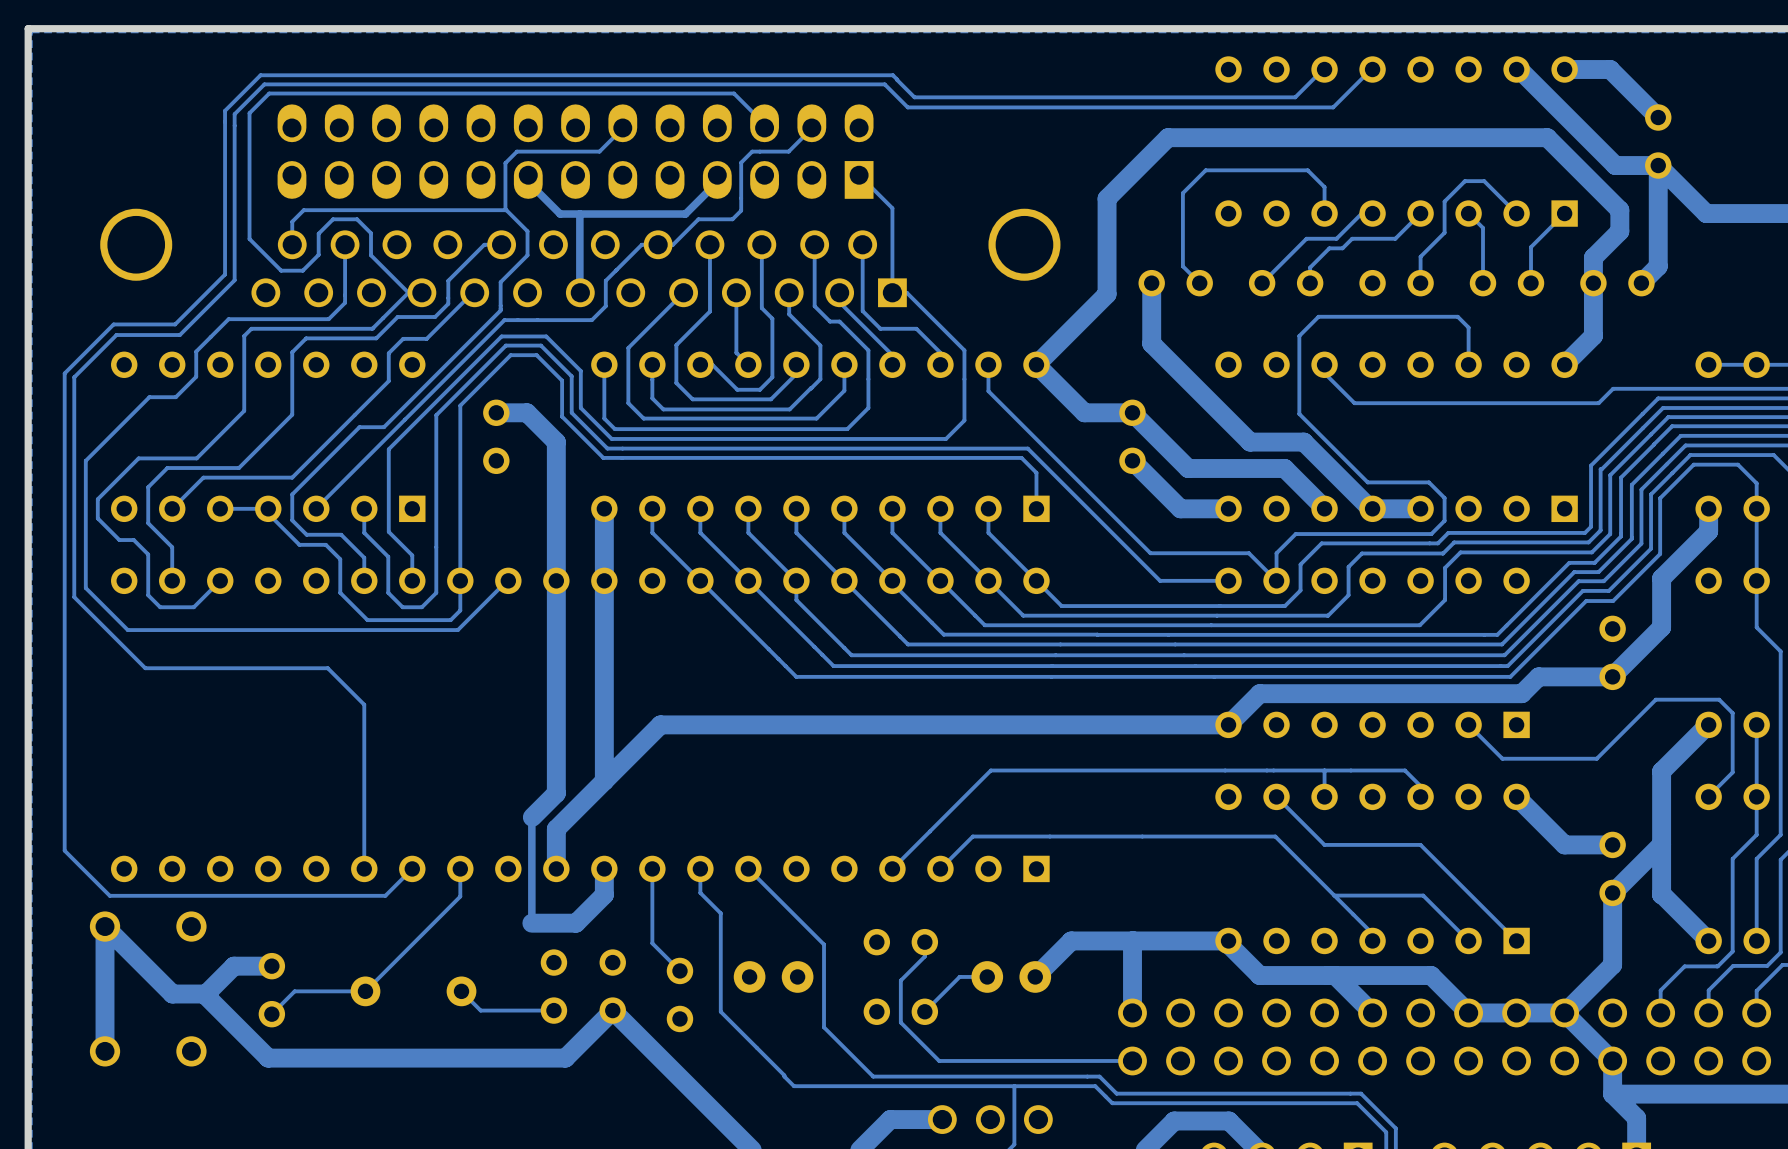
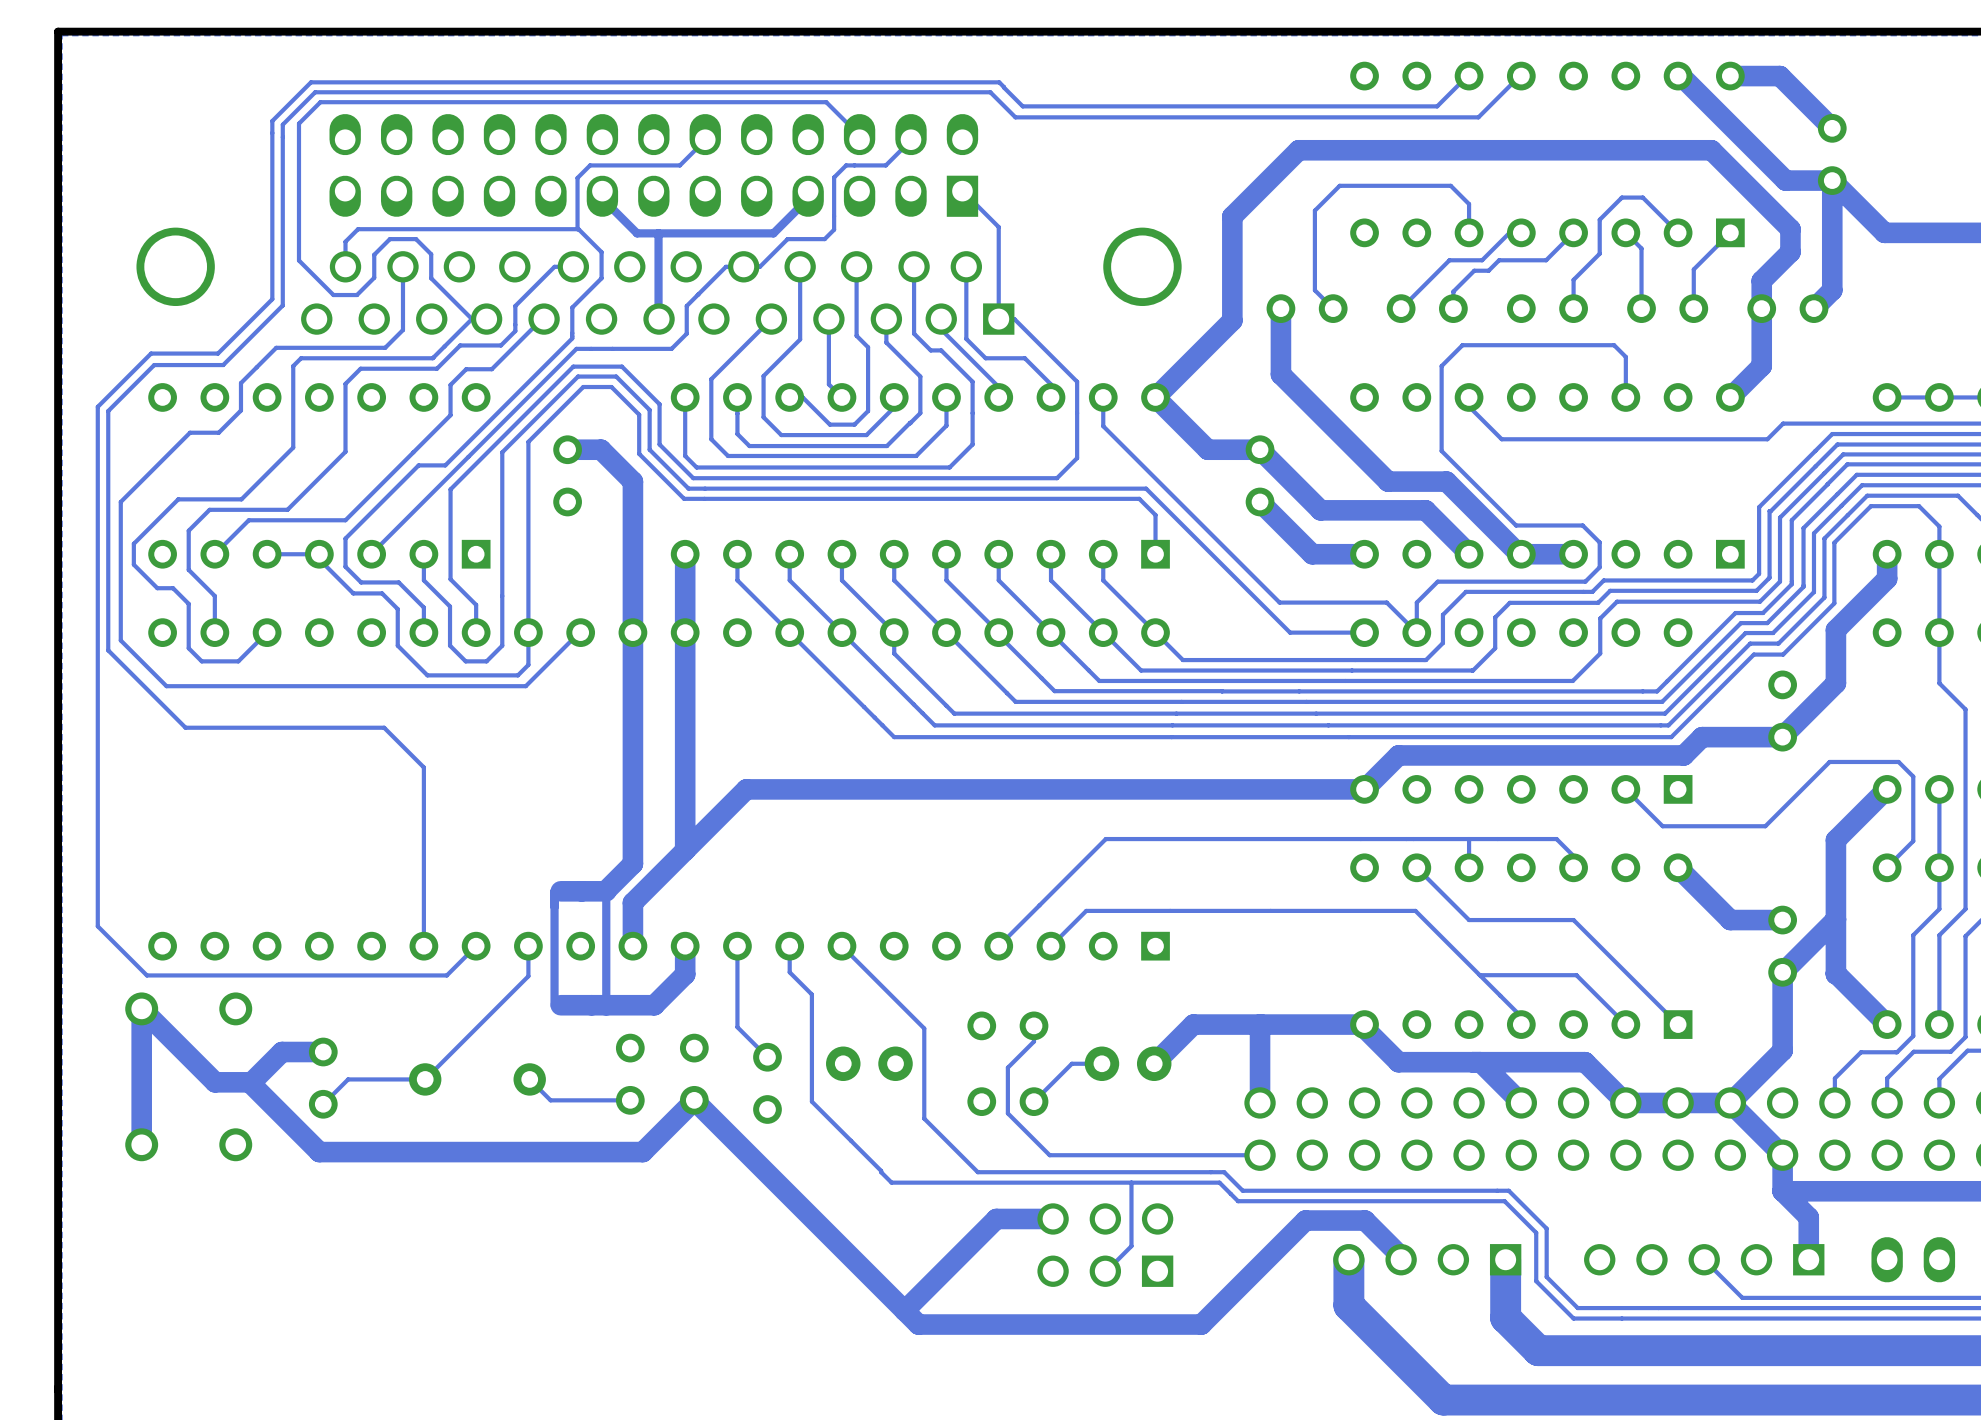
track: none -> (569, 891) (554, 891) (554, 1005)
track: none -> (606, 891) (560, 891)
track: none -> (606, 1005) (560, 1005) (591, 1005)

